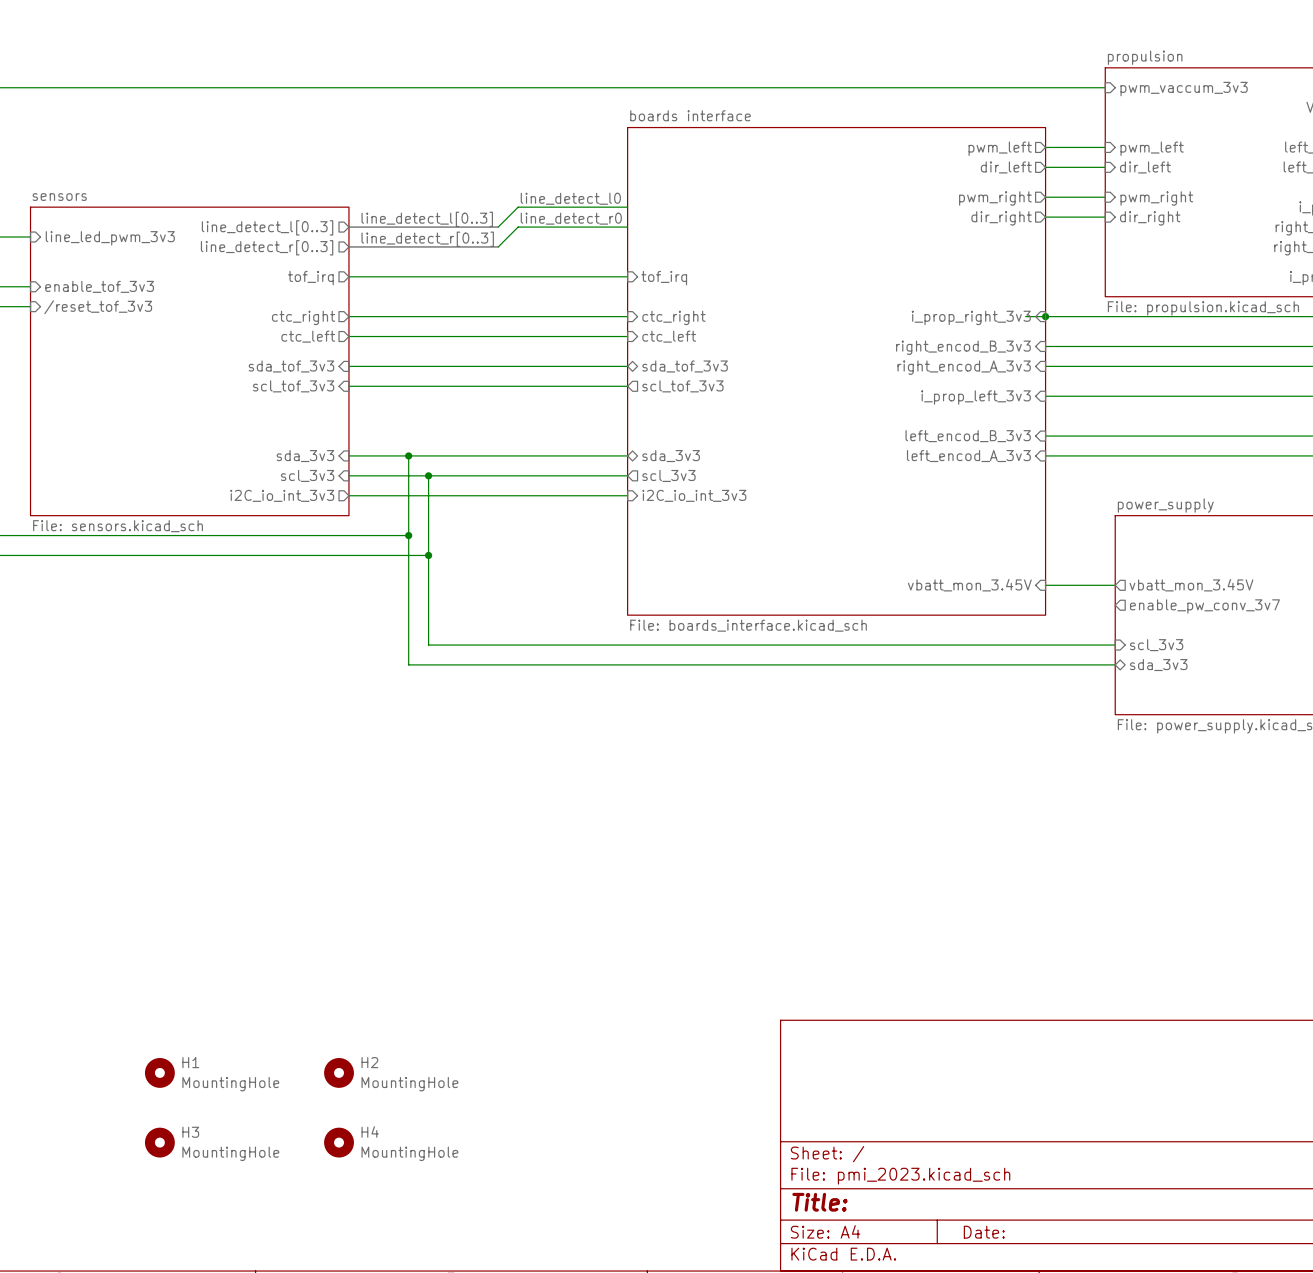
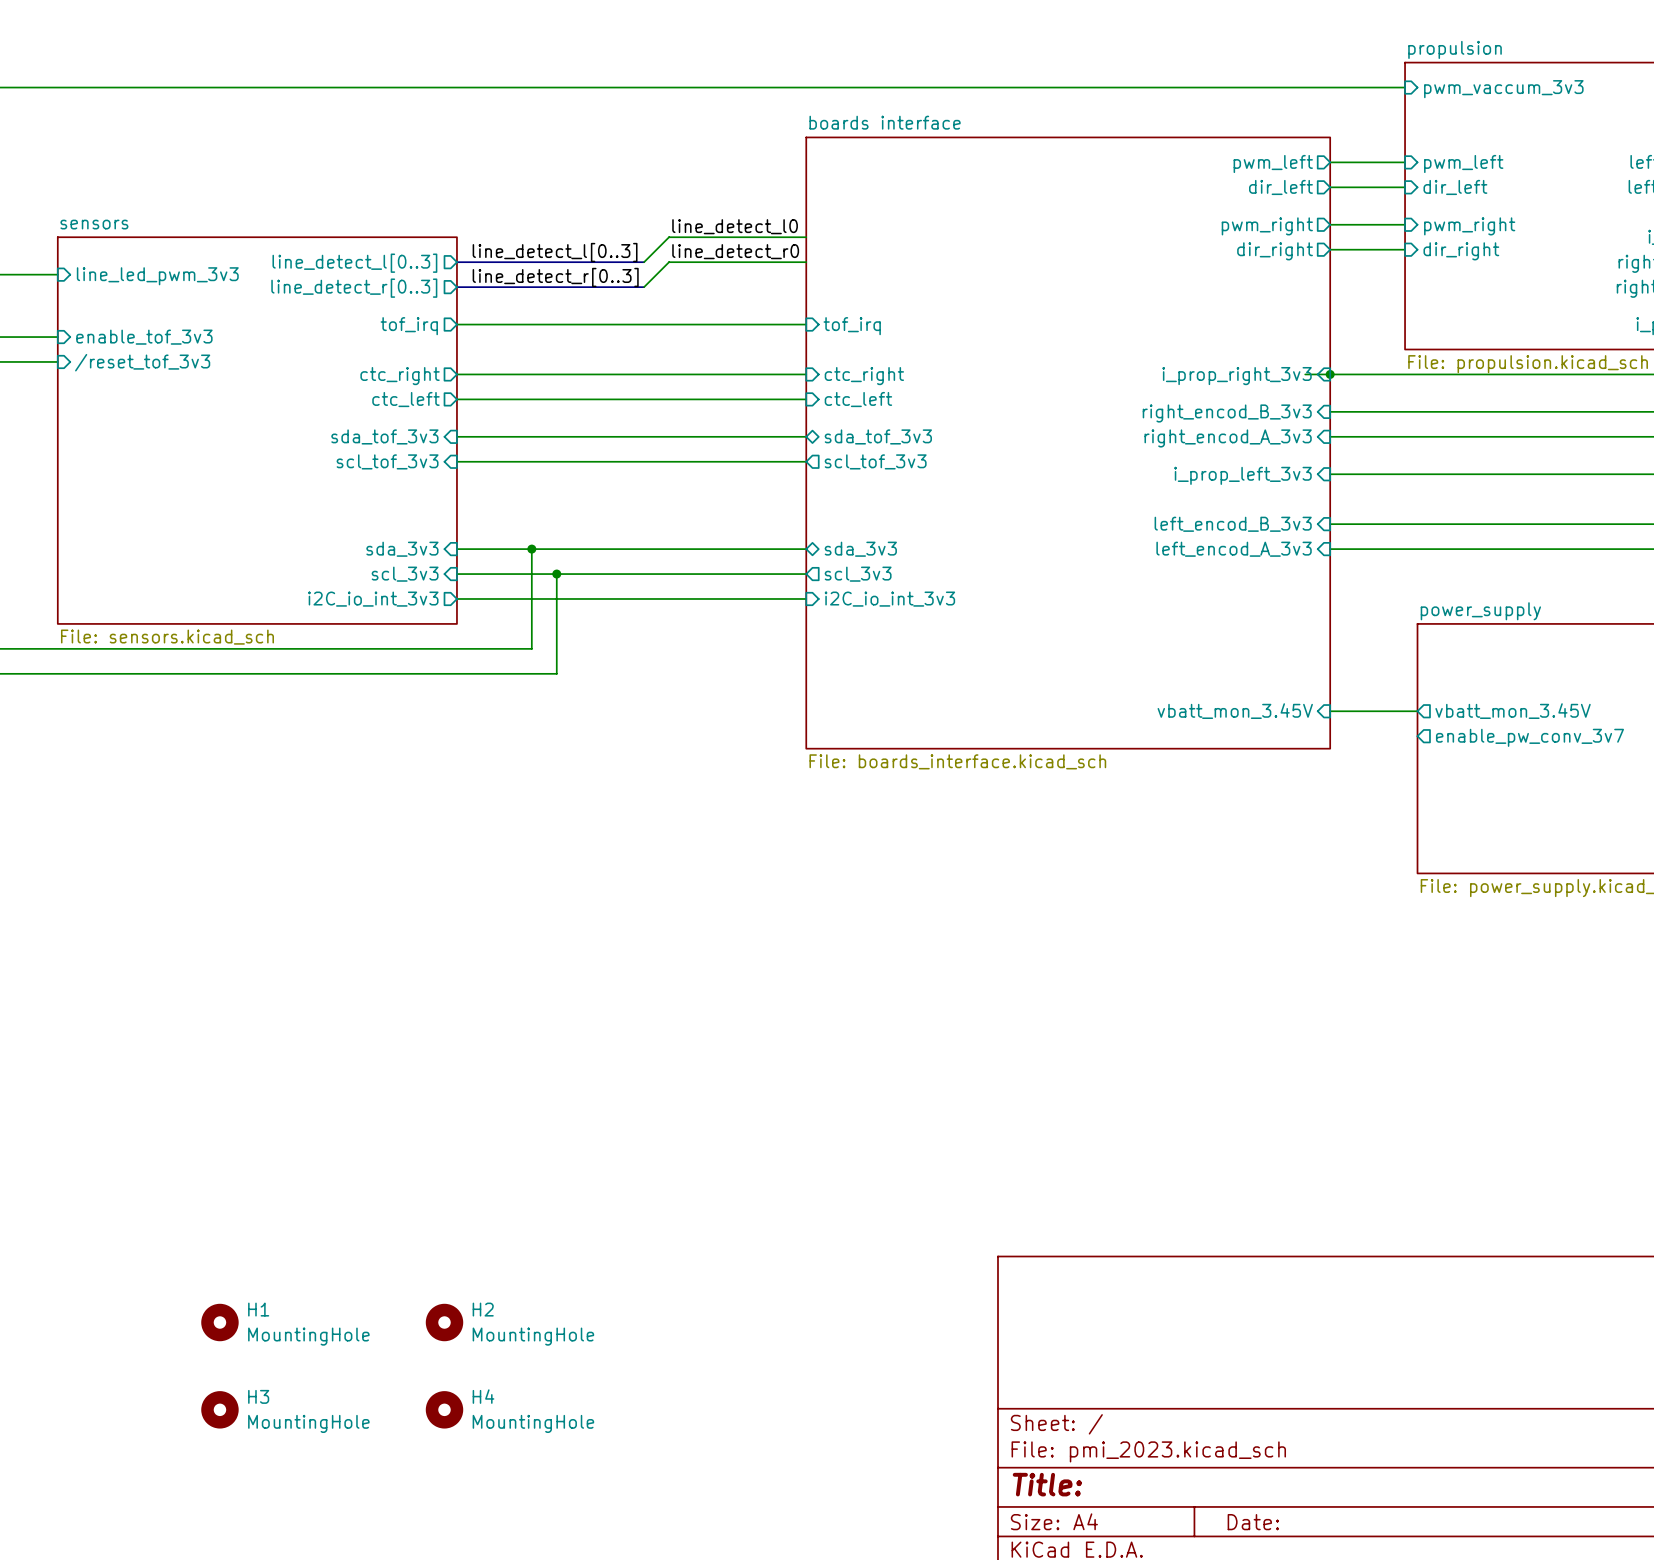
wire: (408, 535) (408, 664) (1115, 664) -> none
junction: (408, 535) -> none
wire: (428, 555) (428, 645) (1115, 645) -> none
junction: (428, 555) -> none
sheet pin: scl_3v3 (1156, 645) -> none
sheet pin: sda_3v3 (1158, 665) -> none

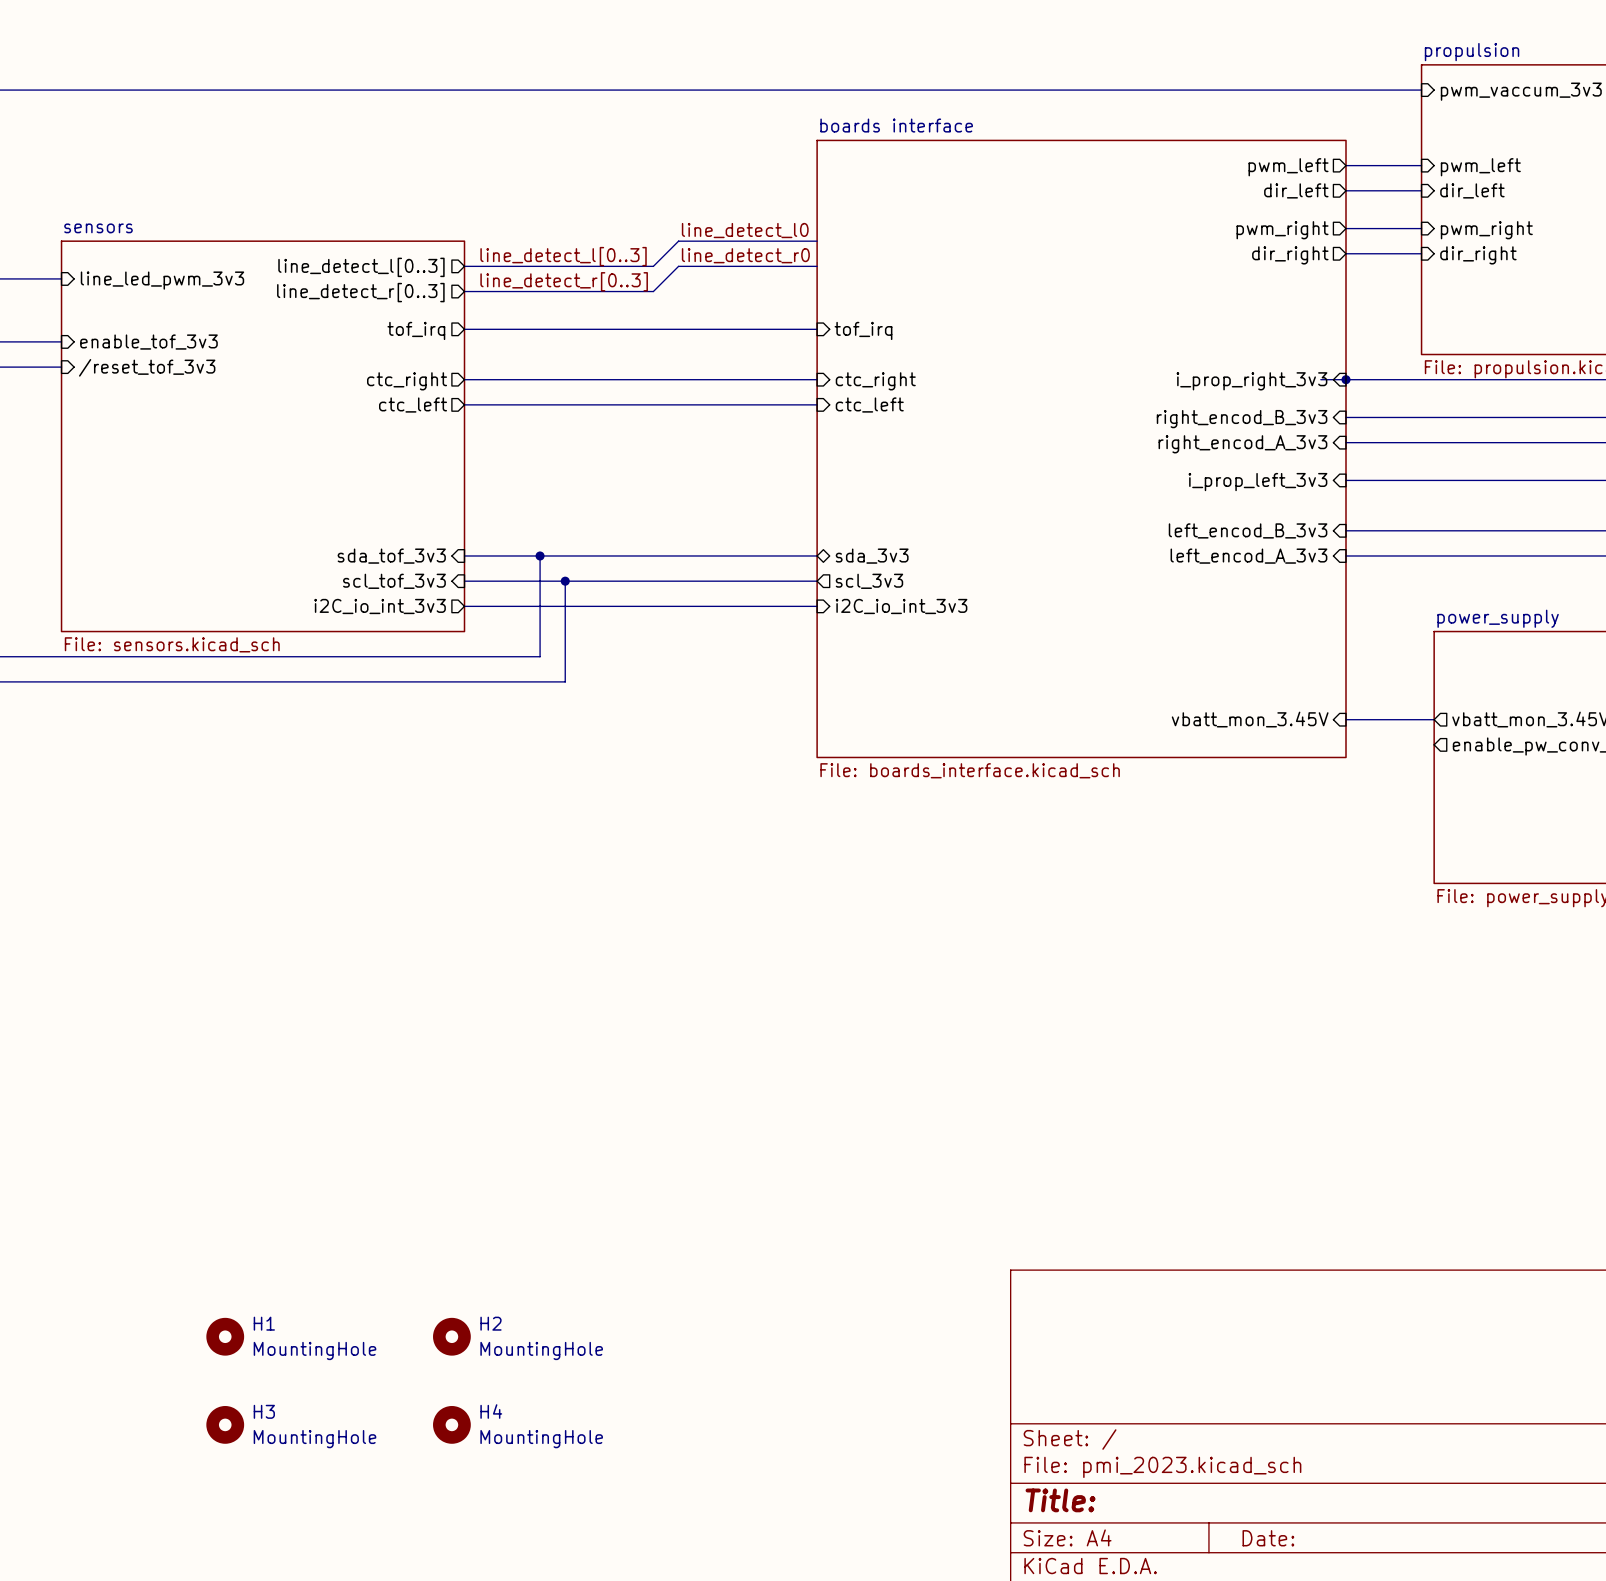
sheet pin: sda_tof_3v3 (384, 436) -> none
wire: (456, 436) (806, 436) -> none
sheet pin: sda_tof_3v3 (878, 436) -> none
sheet pin: scl_tof_3v3 (387, 461) -> none
wire: (456, 461) (806, 461) -> none
sheet pin: scl_tof_3v3 (875, 461) -> none
sheet pin: sda_3v3 (402, 549) -> sda_tof_3v3 (391, 556)
sheet pin: scl_3v3 (405, 574) -> scl_tof_3v3 (394, 581)

